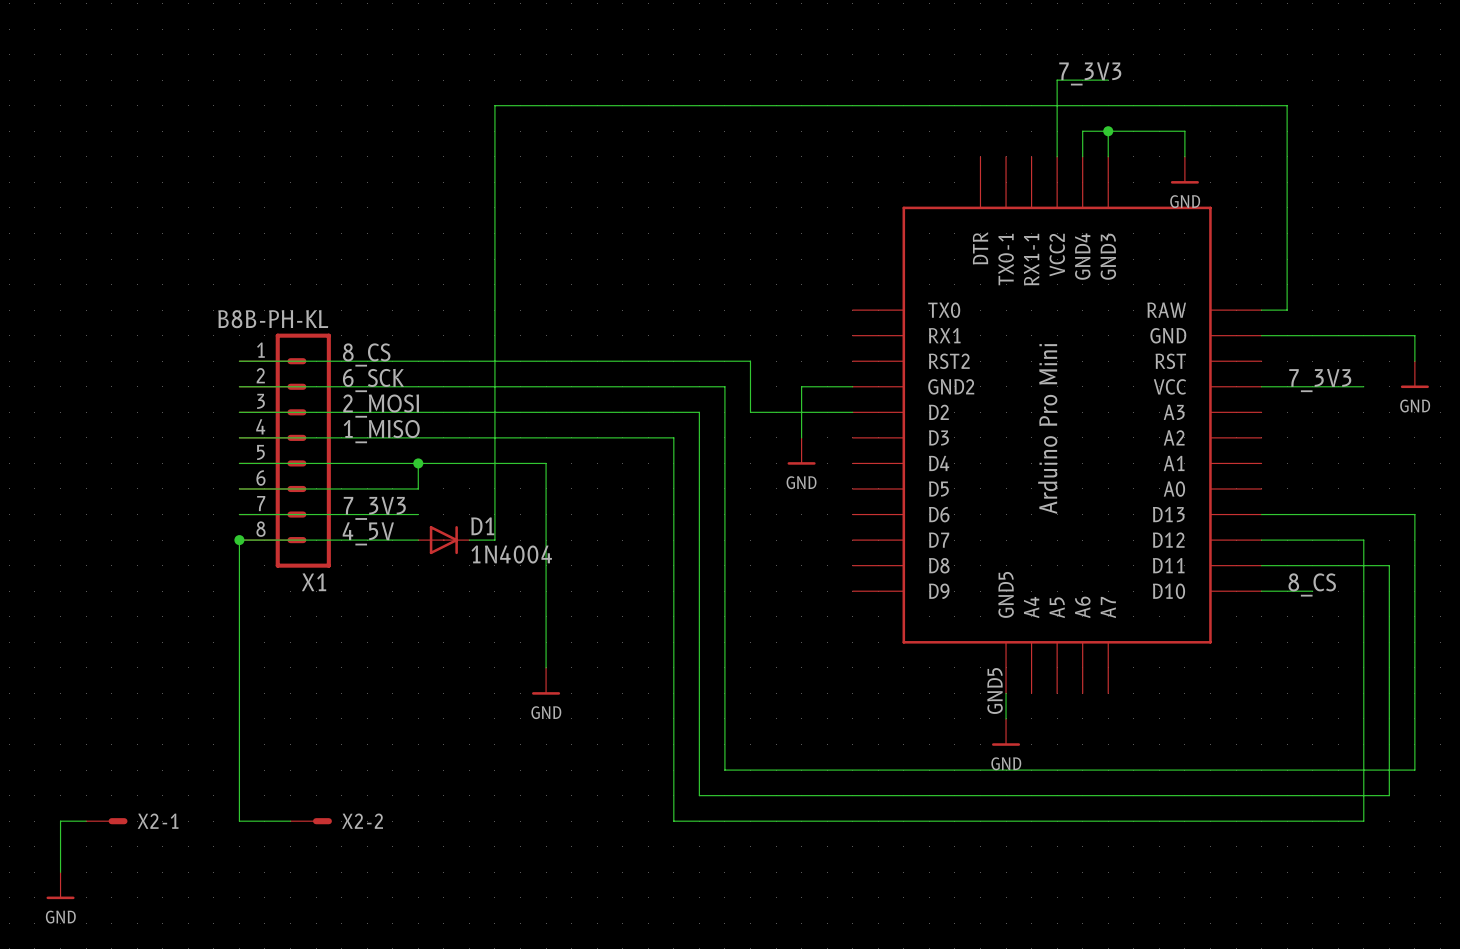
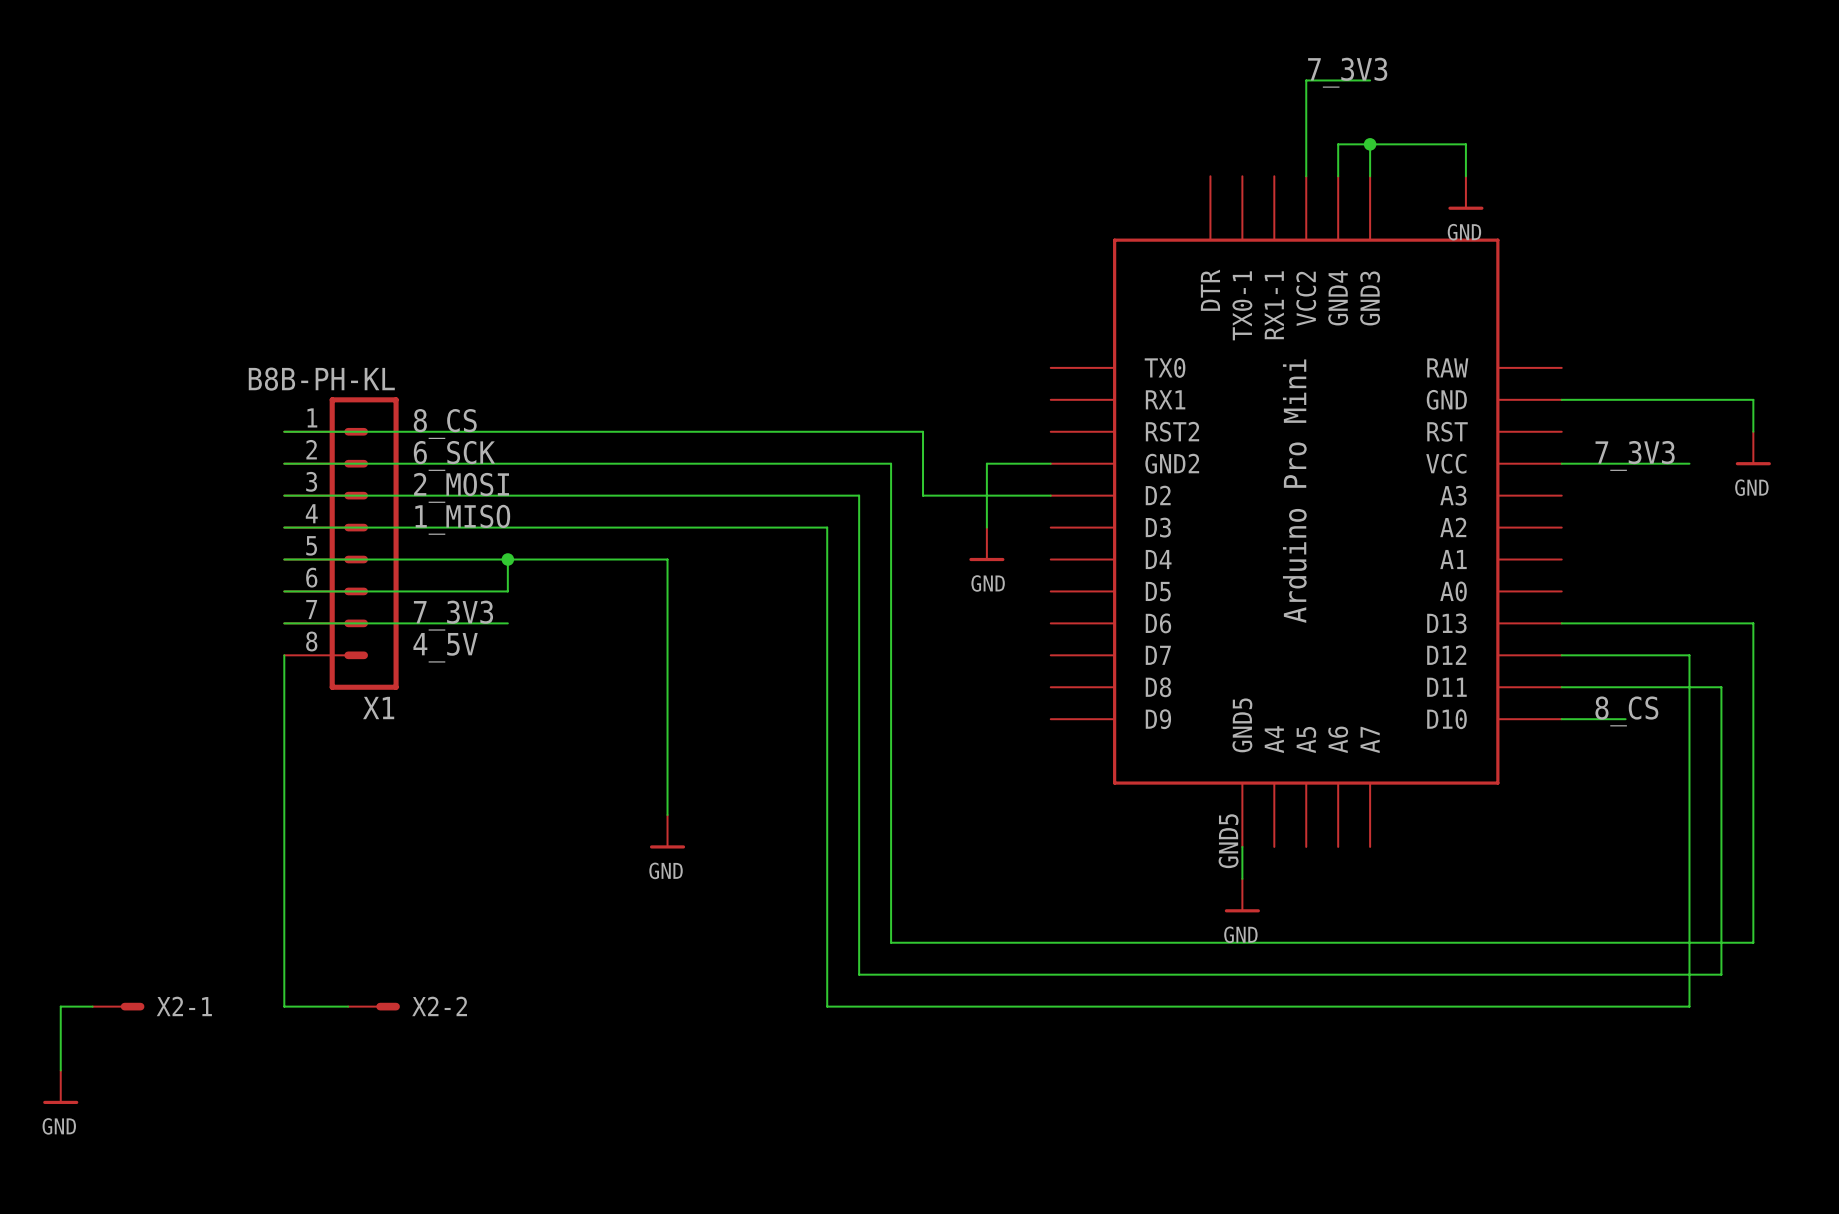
wire: (1261, 310) (1287, 310) (1287, 105) (494, 105) (494, 540) (469, 540) -> none
wire: (239, 540) (418, 540) -> none
junction: (239, 540) -> none
D1: 1N4004 (443, 540) -> none

